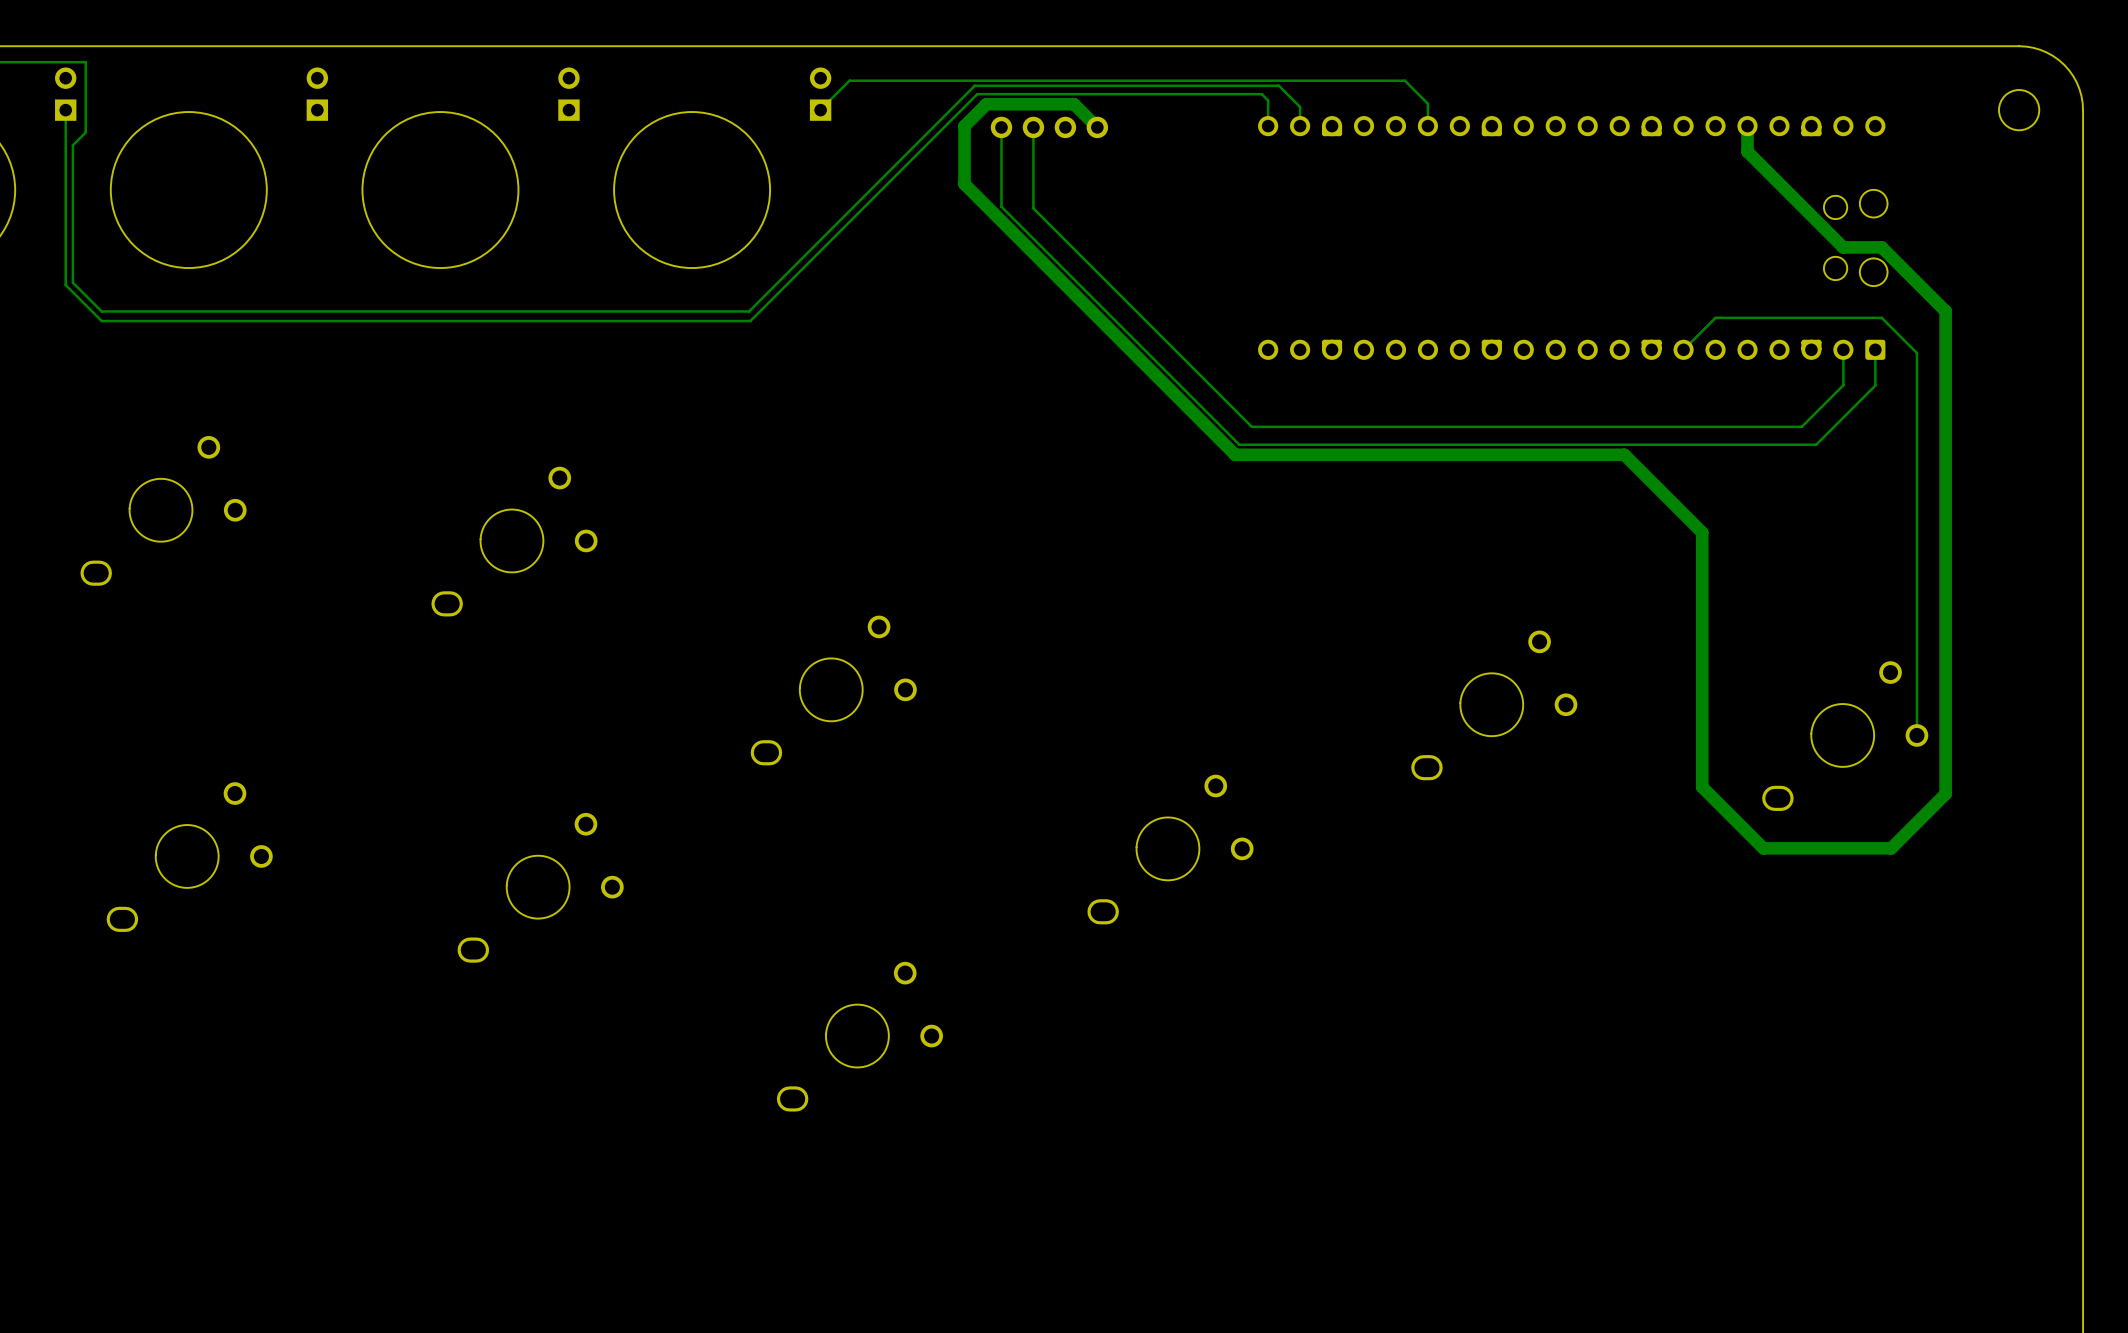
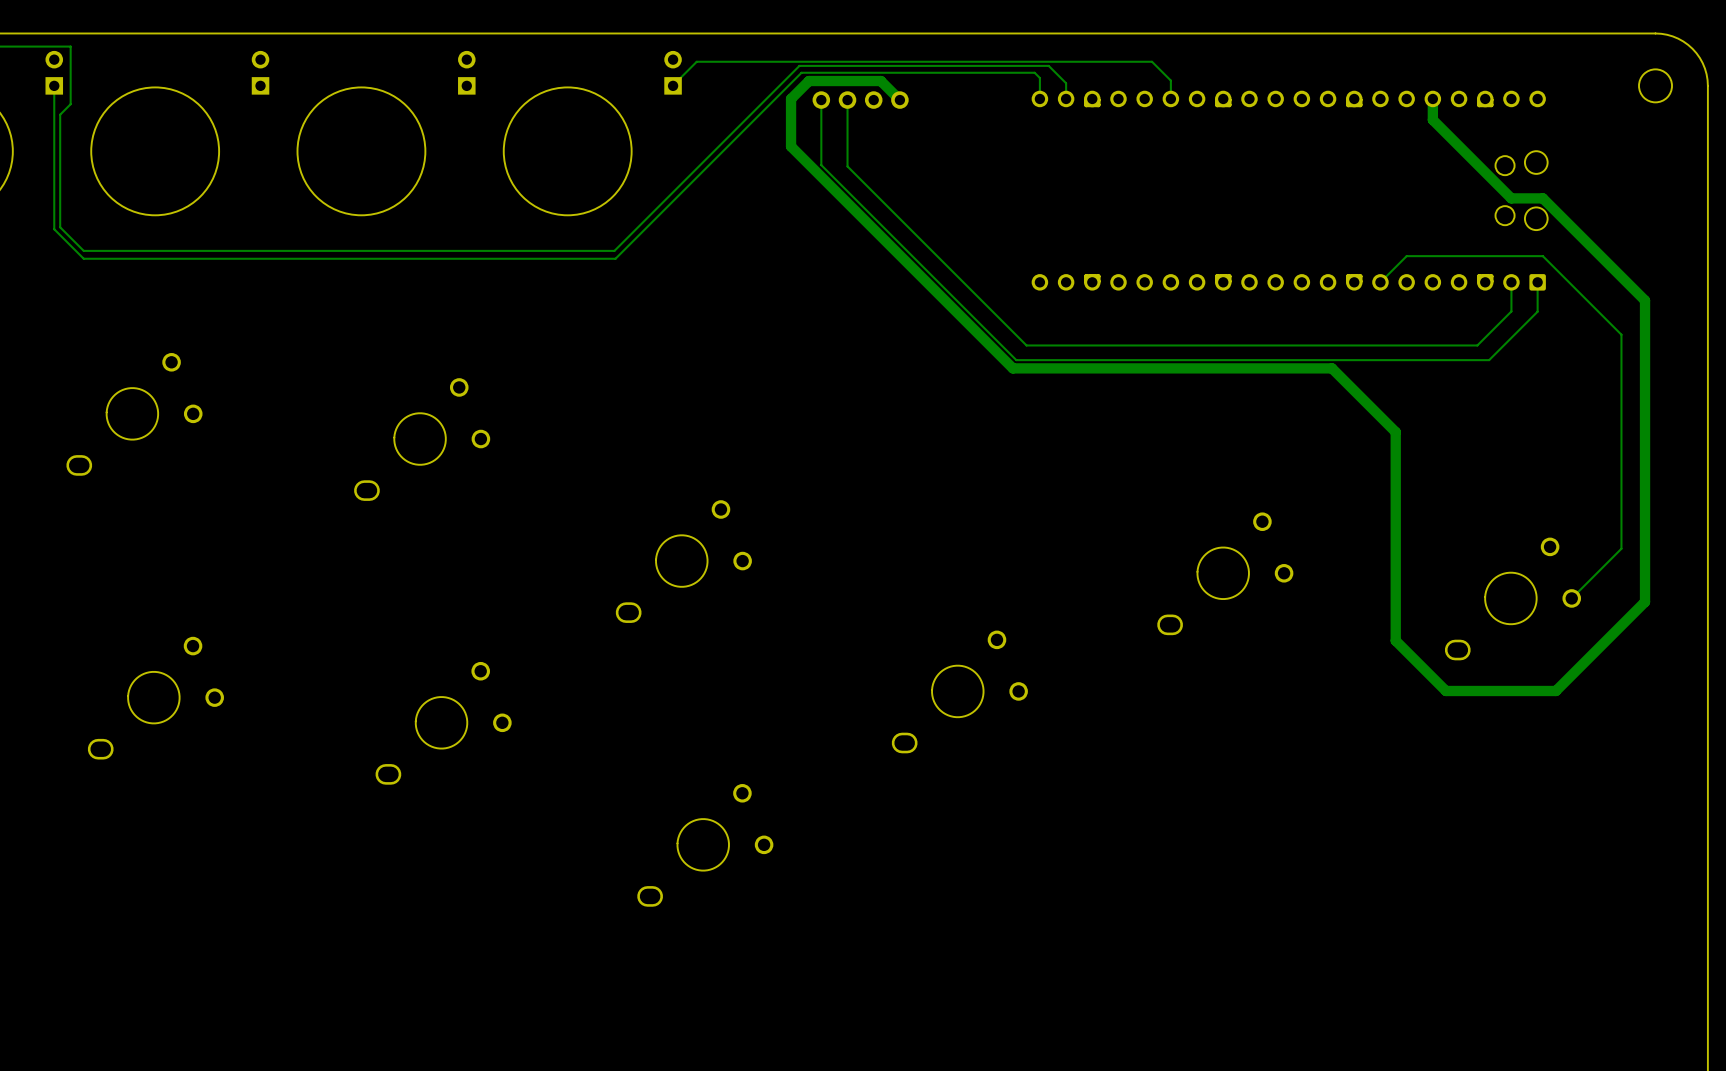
track: (1945, 311) (1945, 794) (1891, 848) -> (1595, 250) (1645, 300) (1645, 601) (1555, 690) (1550, 690)
track: (1916, 353) (1916, 735) -> (1571, 285) (1621, 334) (1621, 548) (1571, 598)

